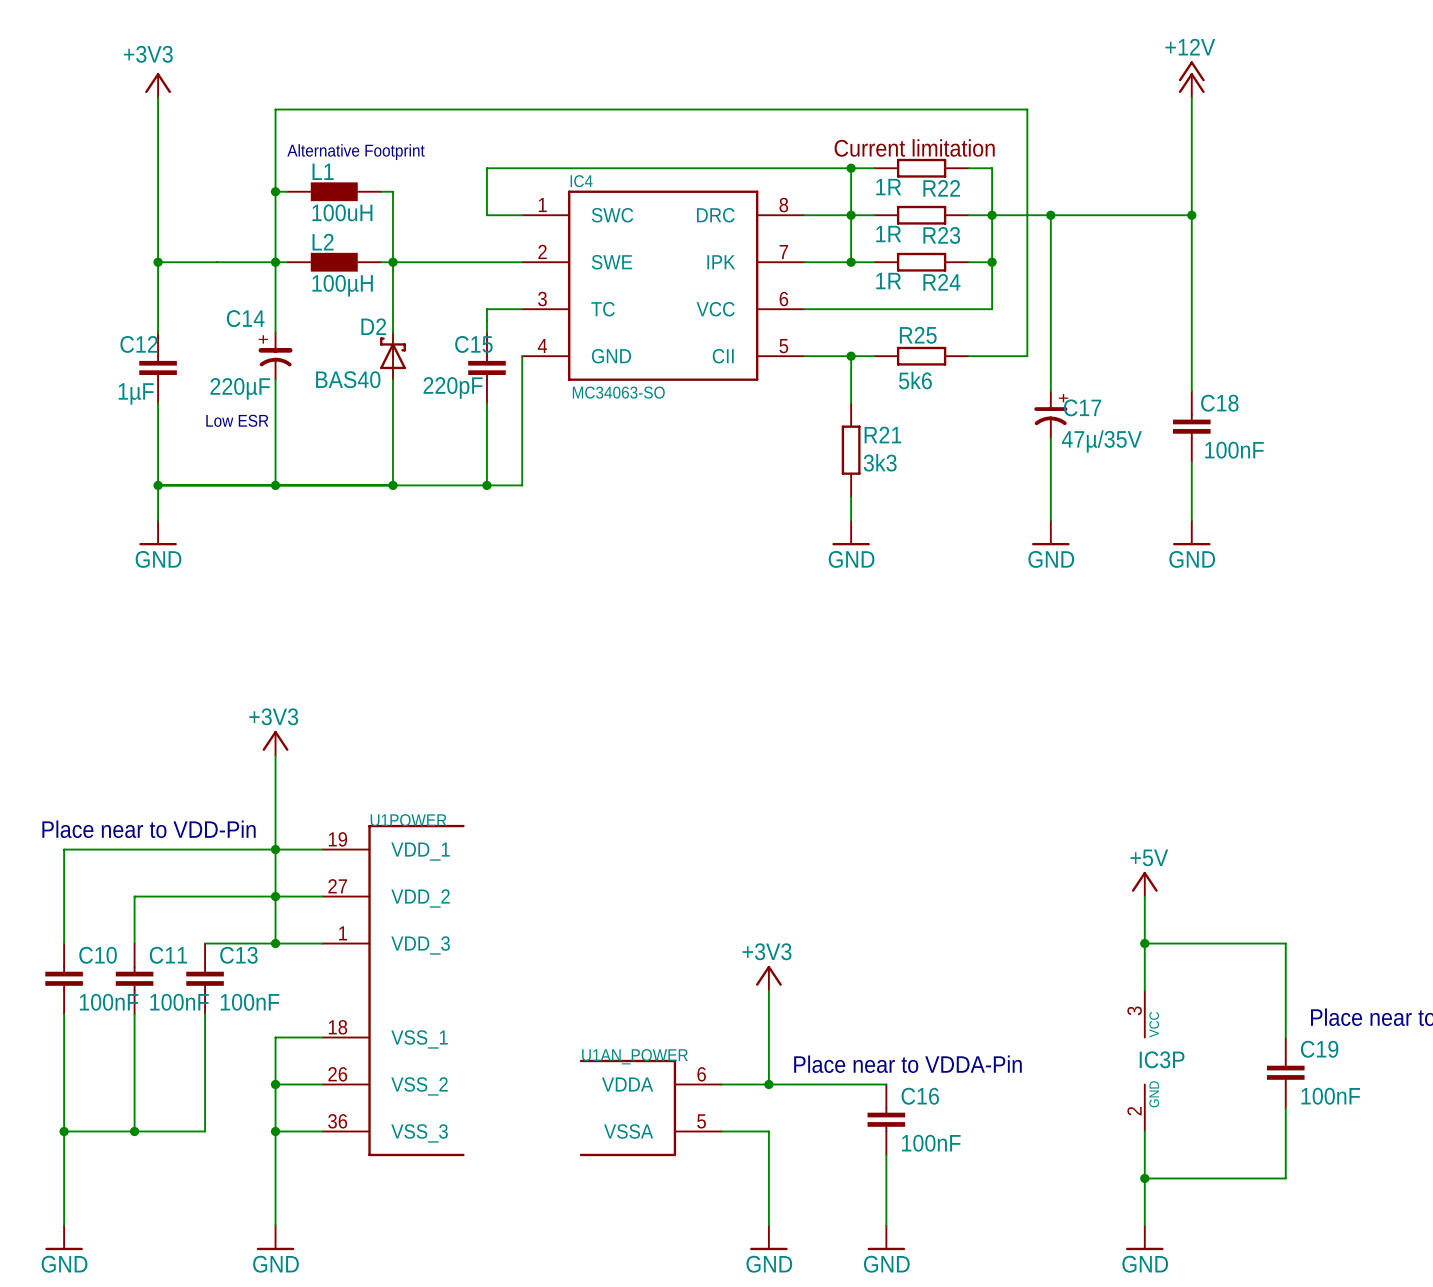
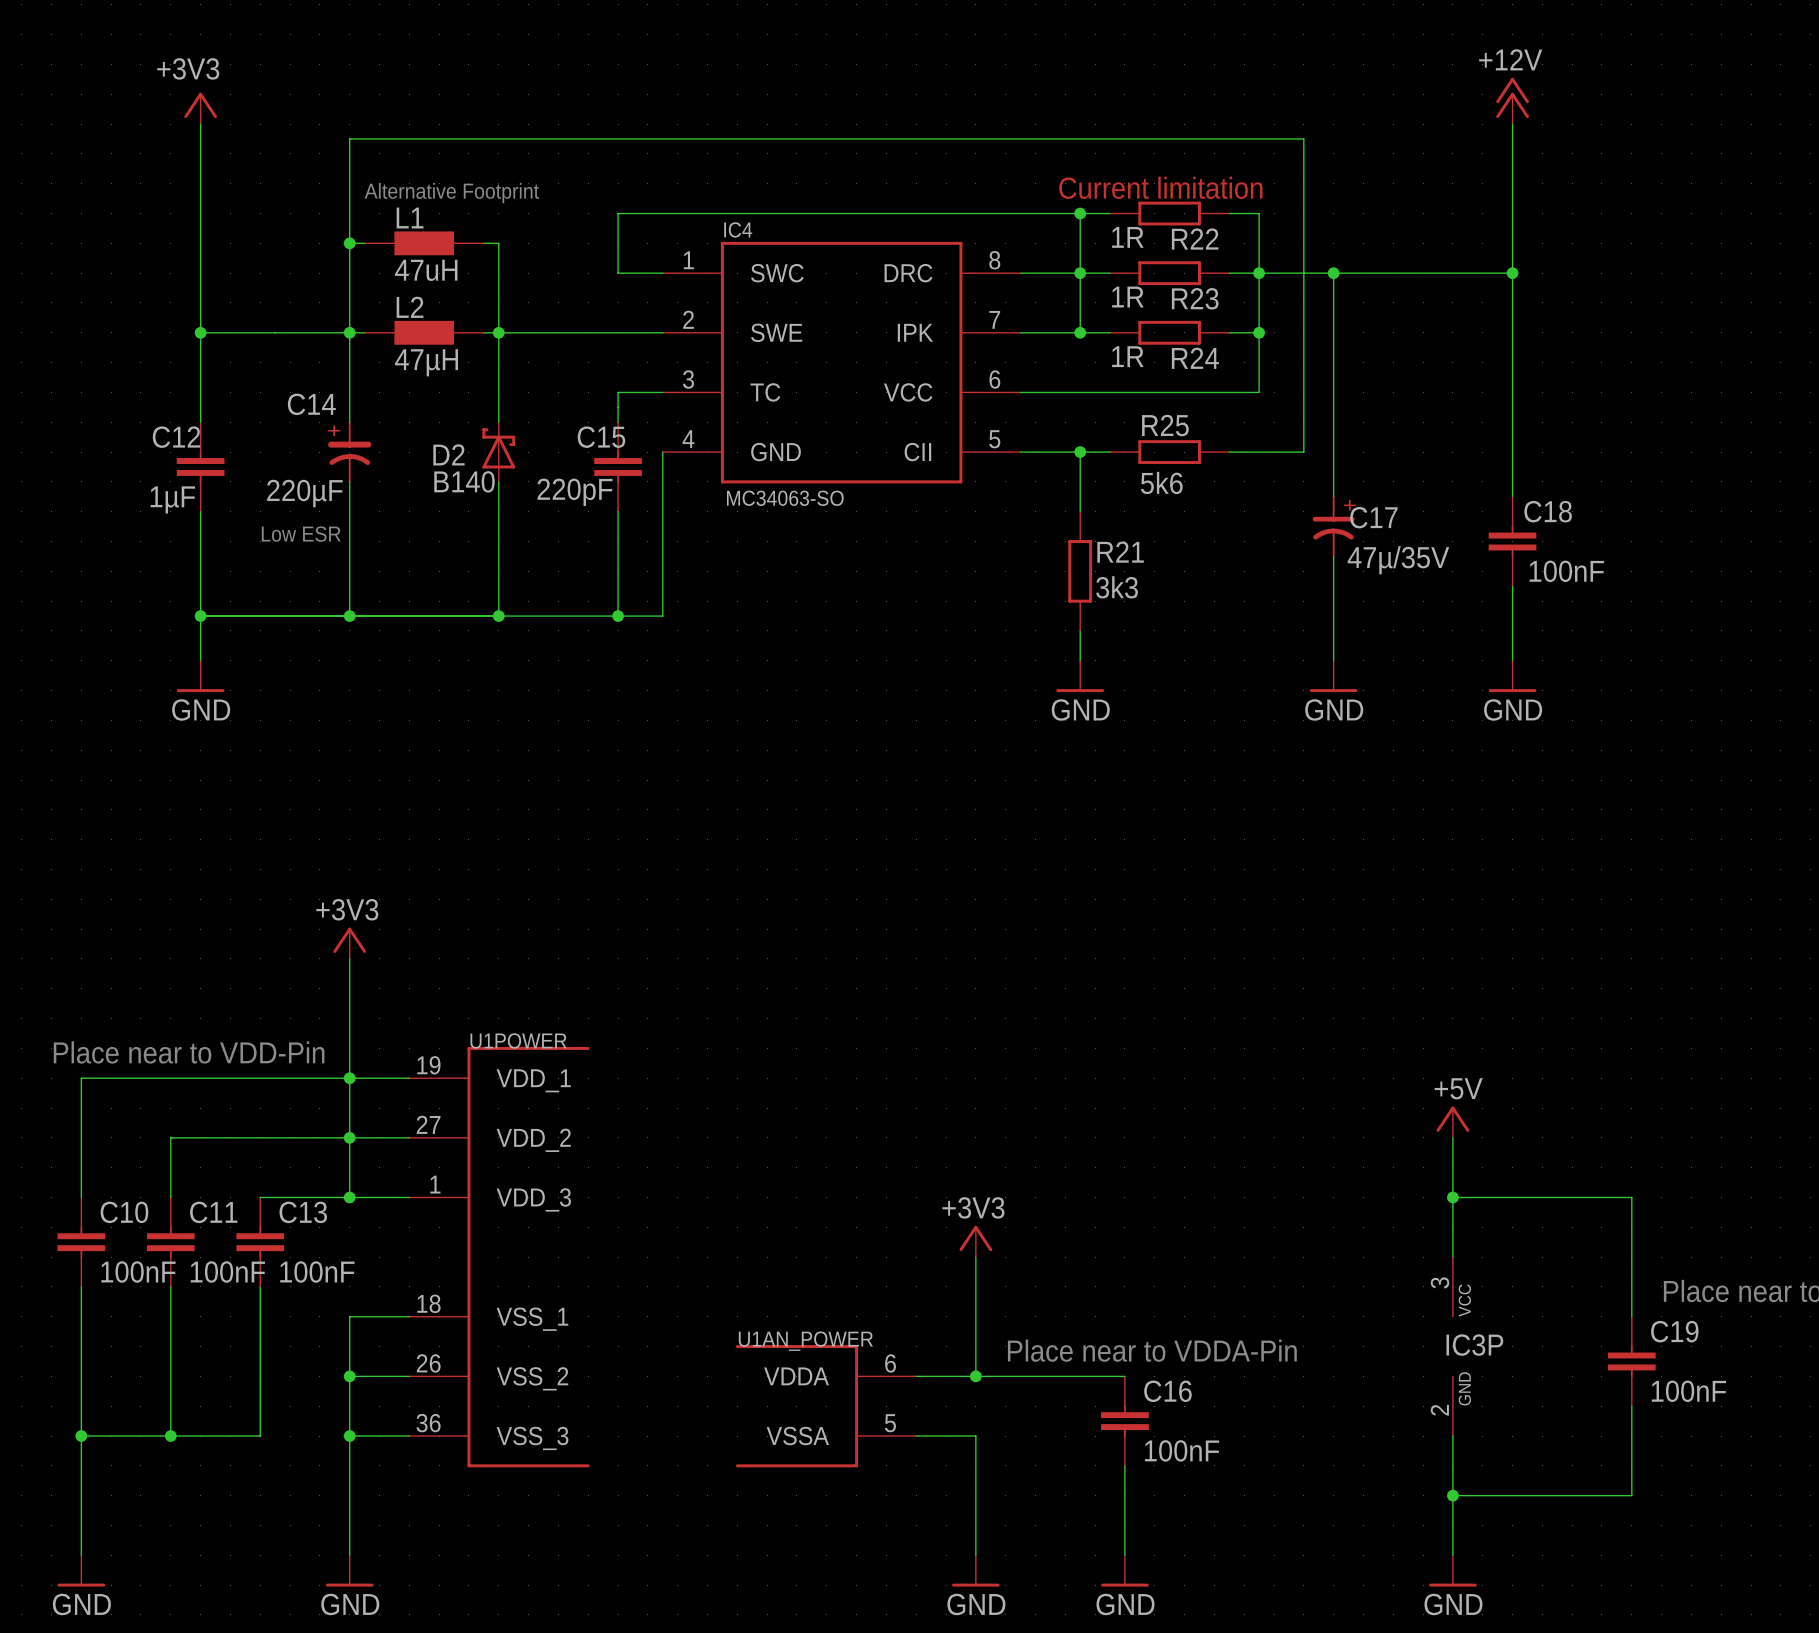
L1 value: 100uH (342, 212) -> 47uH (426, 270)
L2 value: 100µH (342, 285) -> 47µH (426, 362)
D2 name position: D2 (373, 326) -> D2 (448, 454)
D2 value: BAS40 (348, 379) -> B140 (464, 481)

